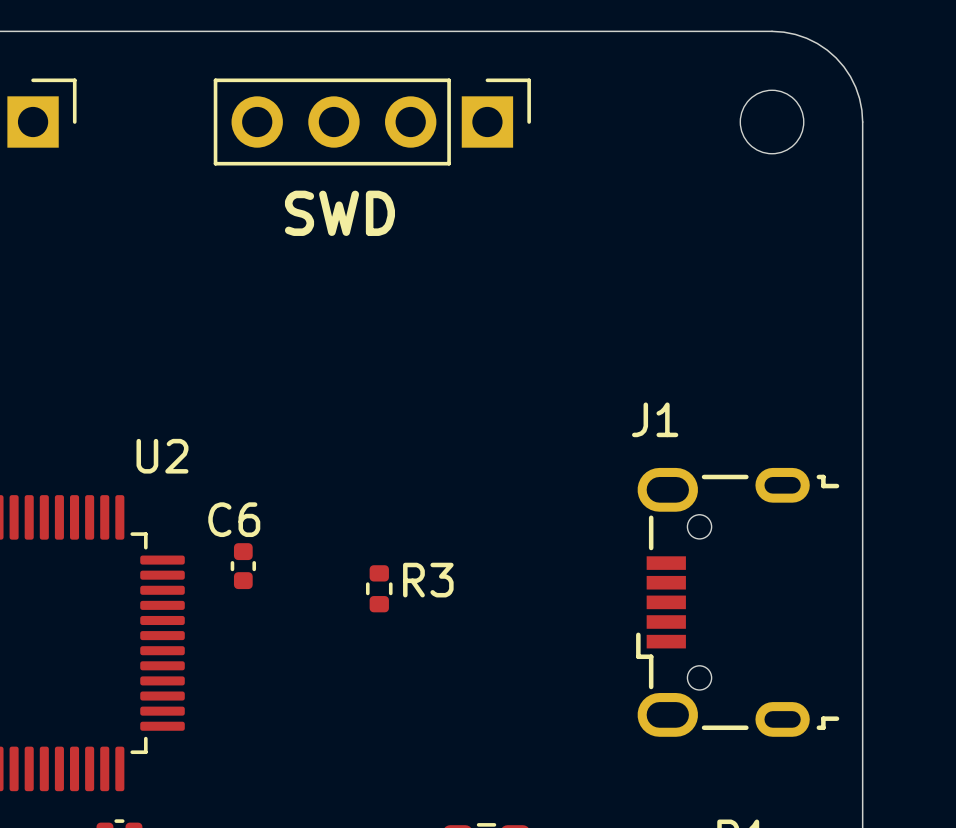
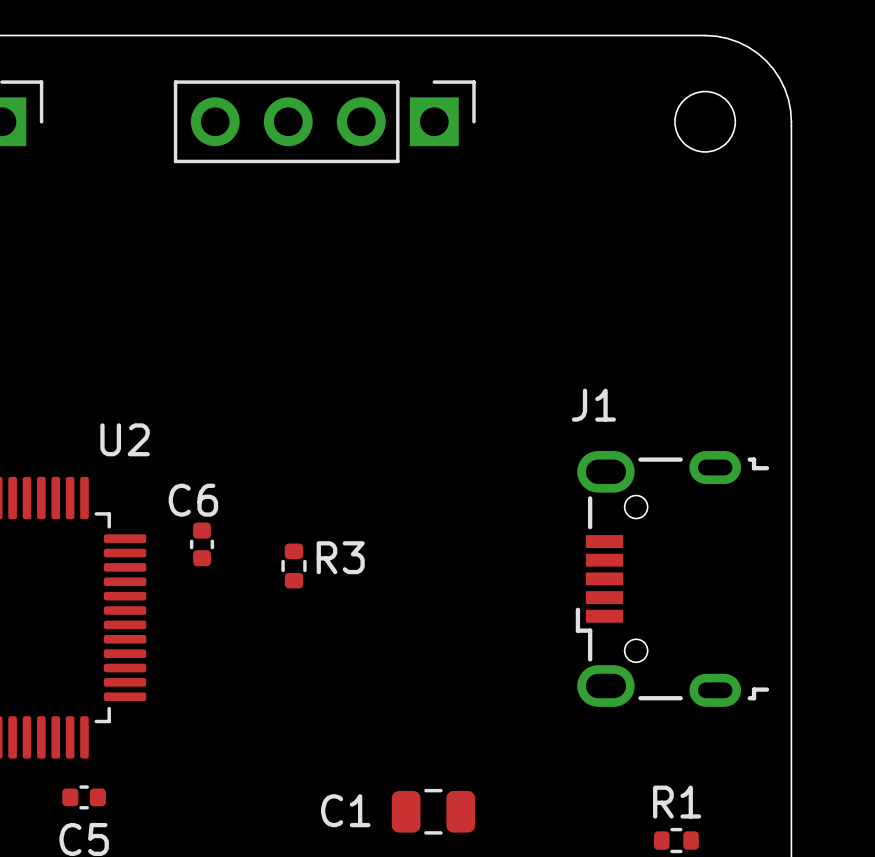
text: SWD (339, 213) -> none
R3 position: (379, 588) -> (294, 565)

